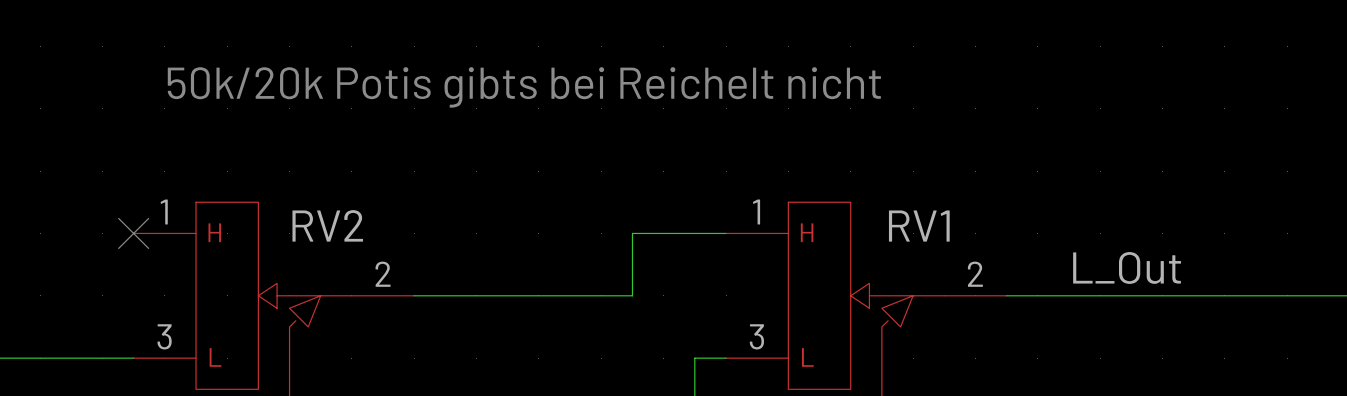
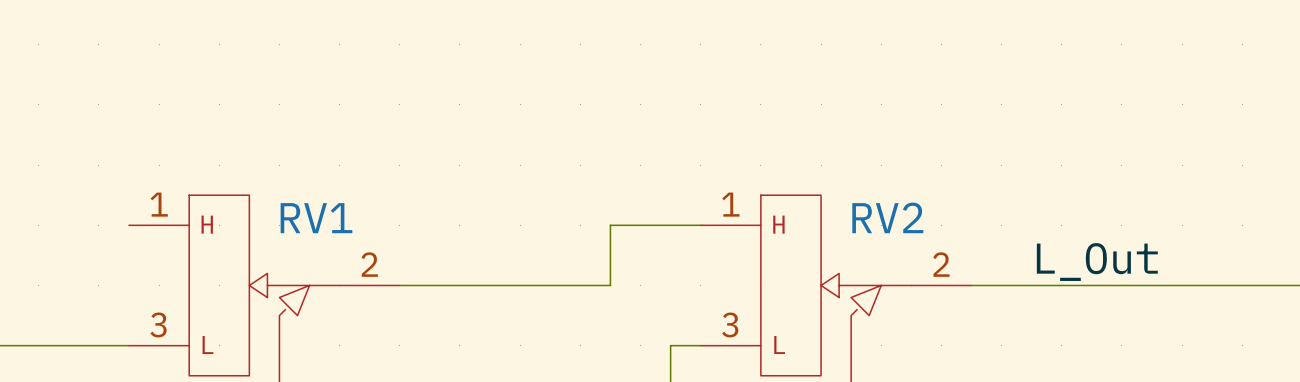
text: 50k/20k Potis gibts bei Reichelt nicht (524, 87) -> none
RV2 name: RV2 (327, 225) -> RV1 (316, 218)
RV1 name: RV1 (919, 226) -> RV2 (887, 217)
no-connect mark: (133, 233) -> none

